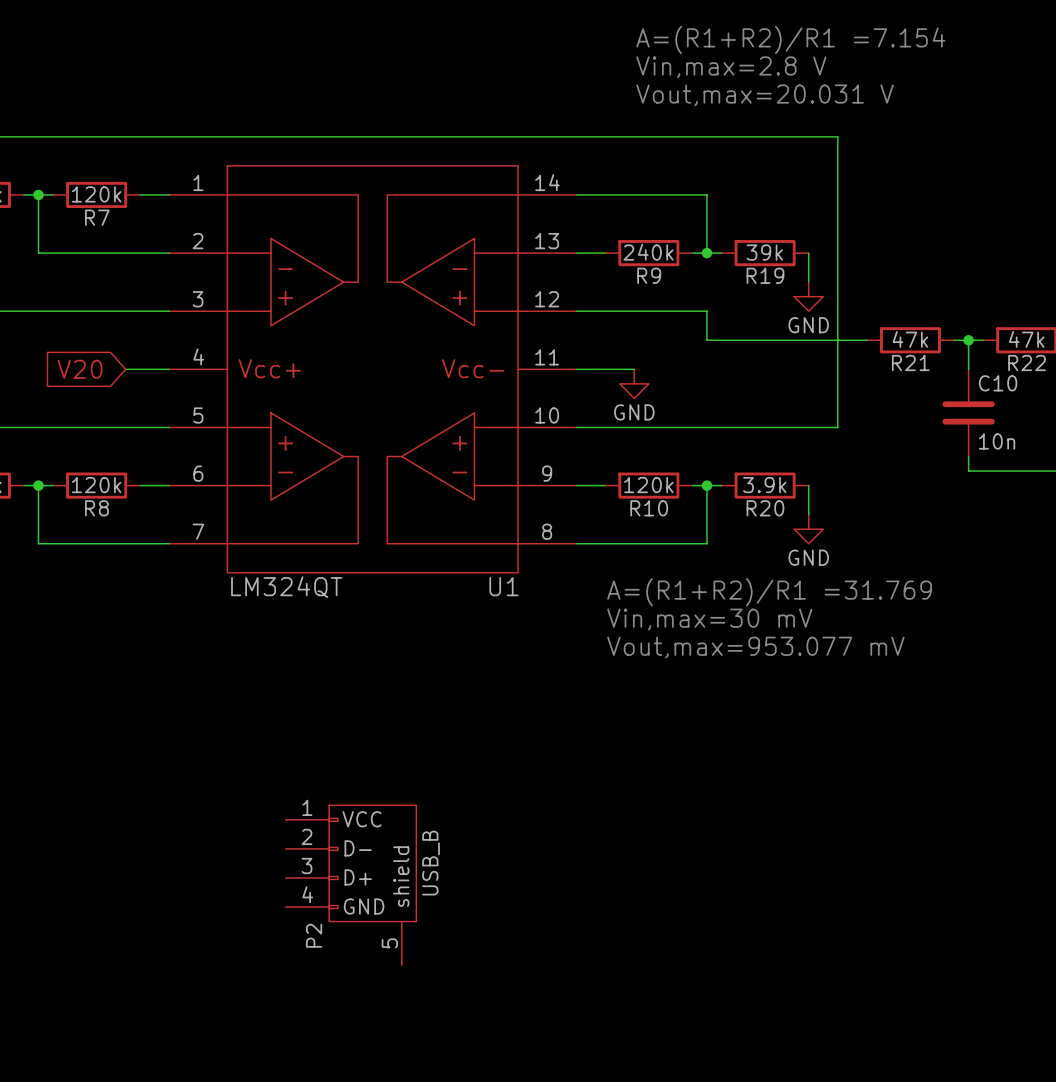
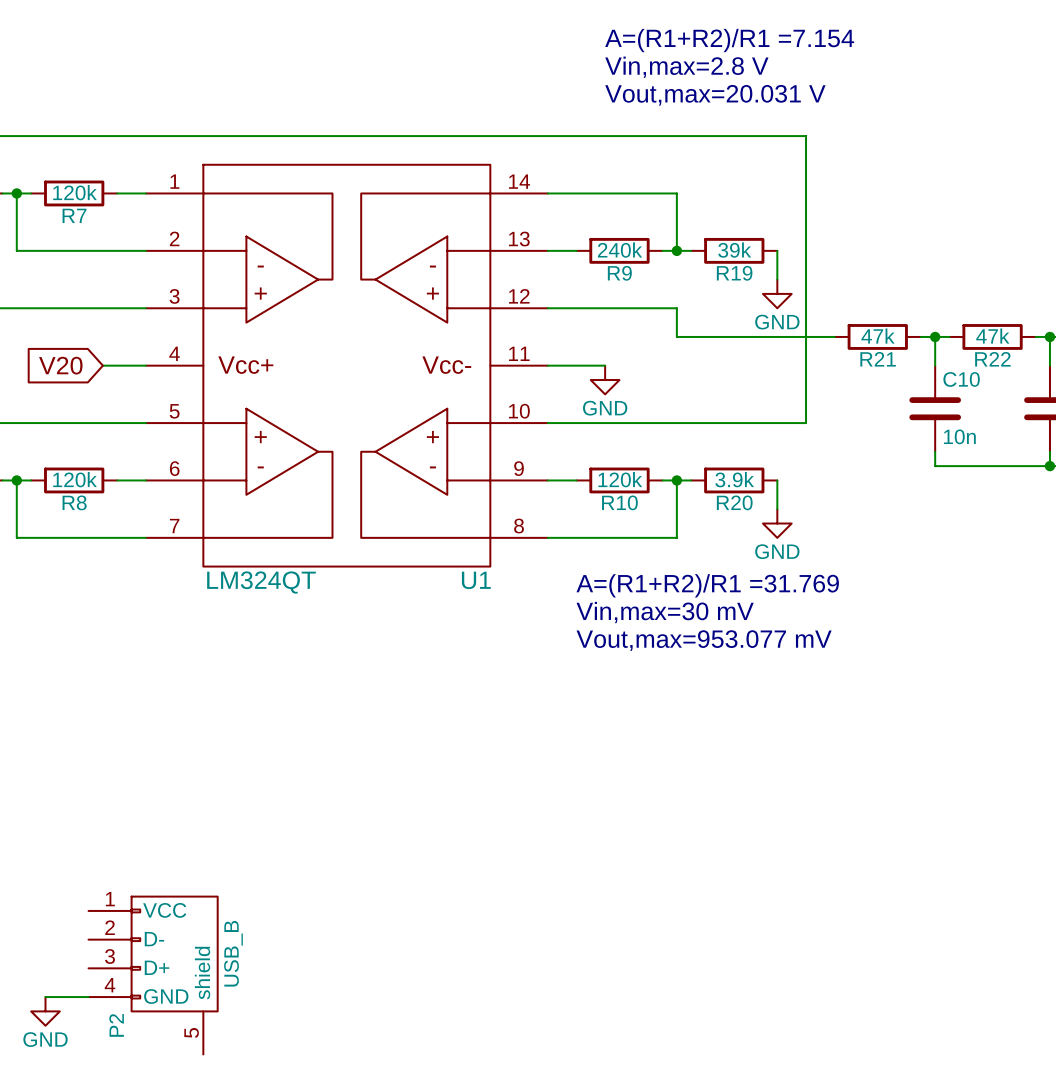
P2 position: (350, 885) -> (153, 975)
wire: none -> (45, 997) (88, 997)
power symbol: none -> GND (45, 1011)

